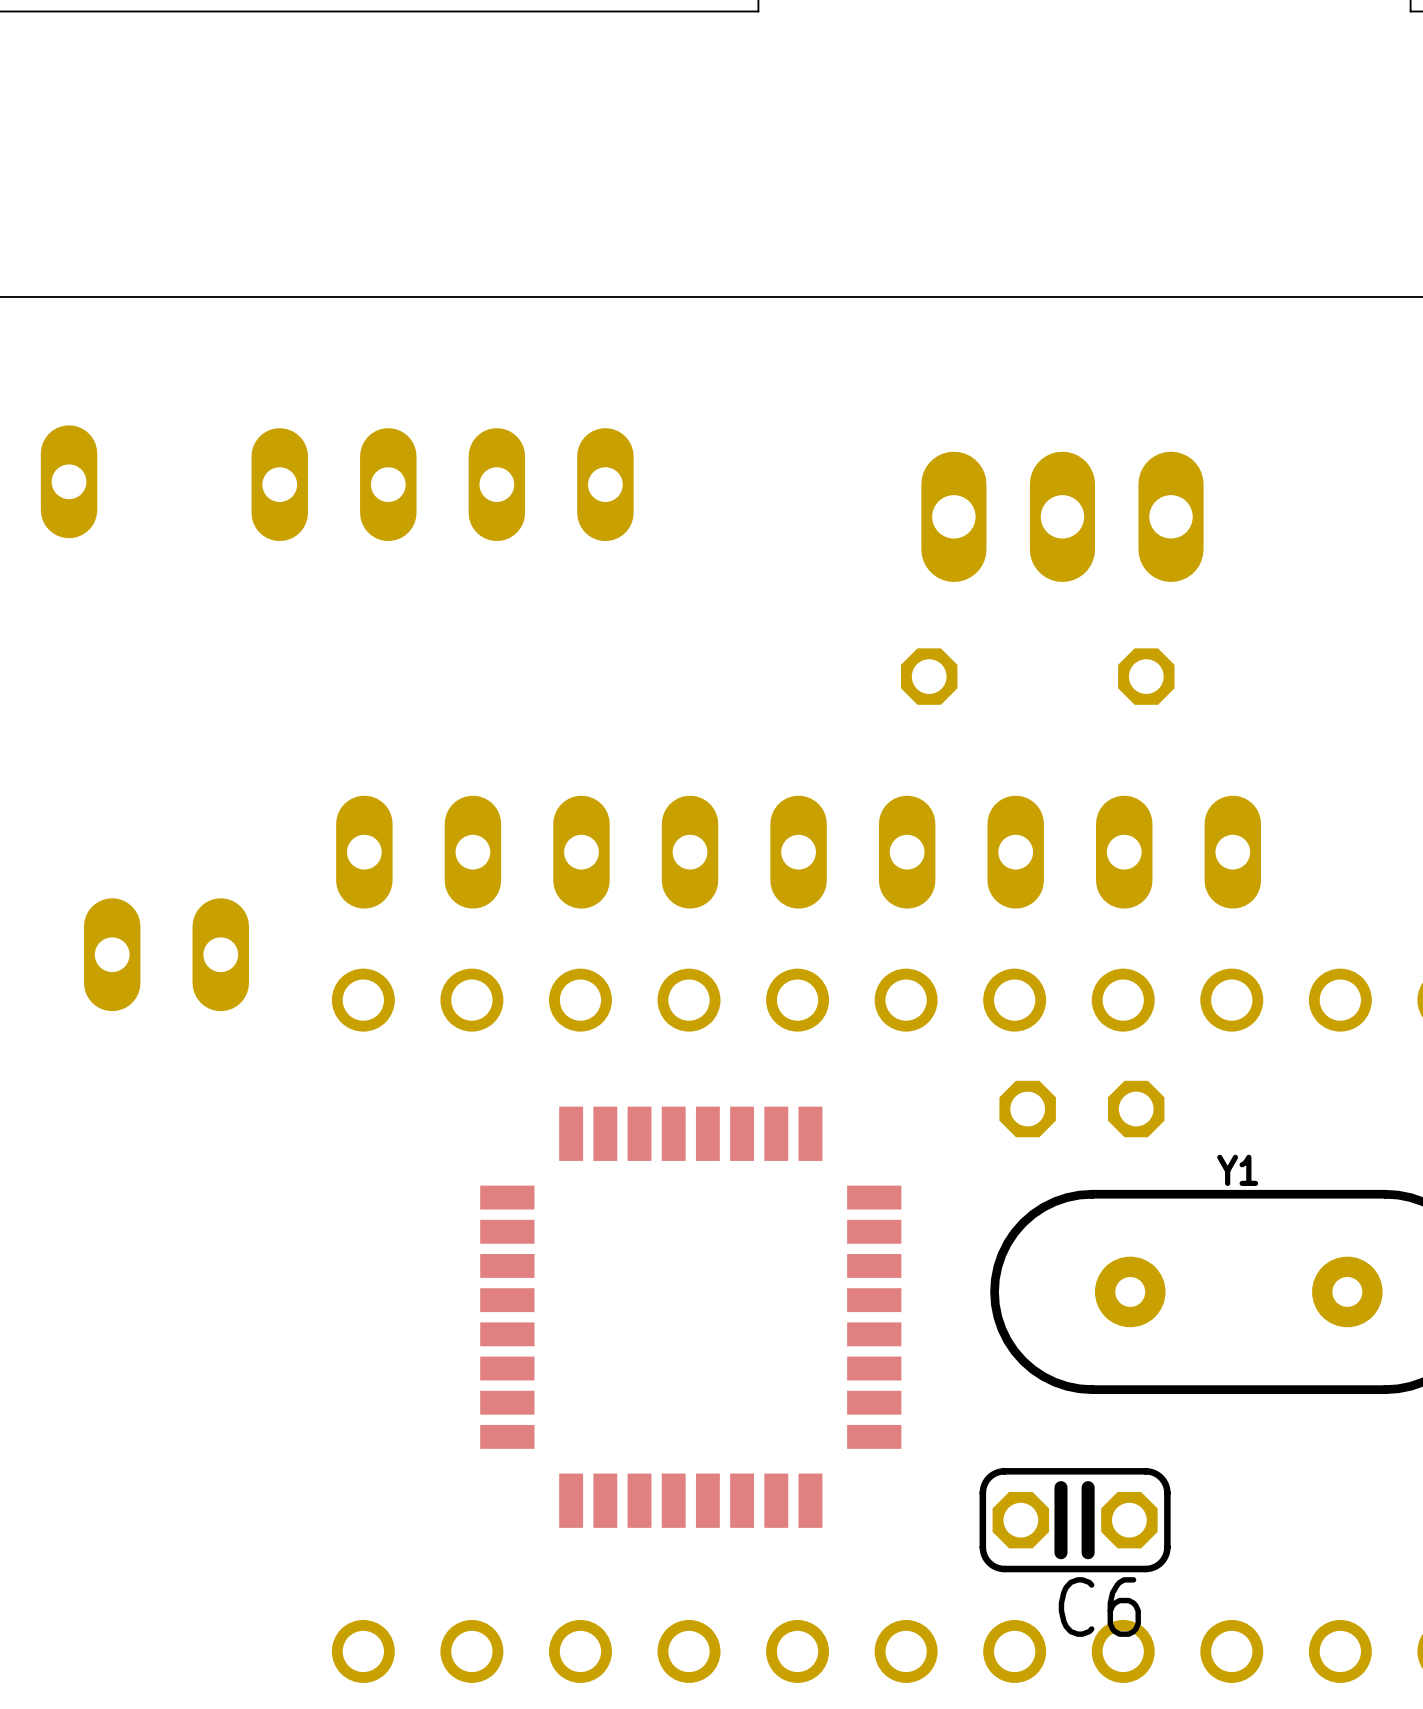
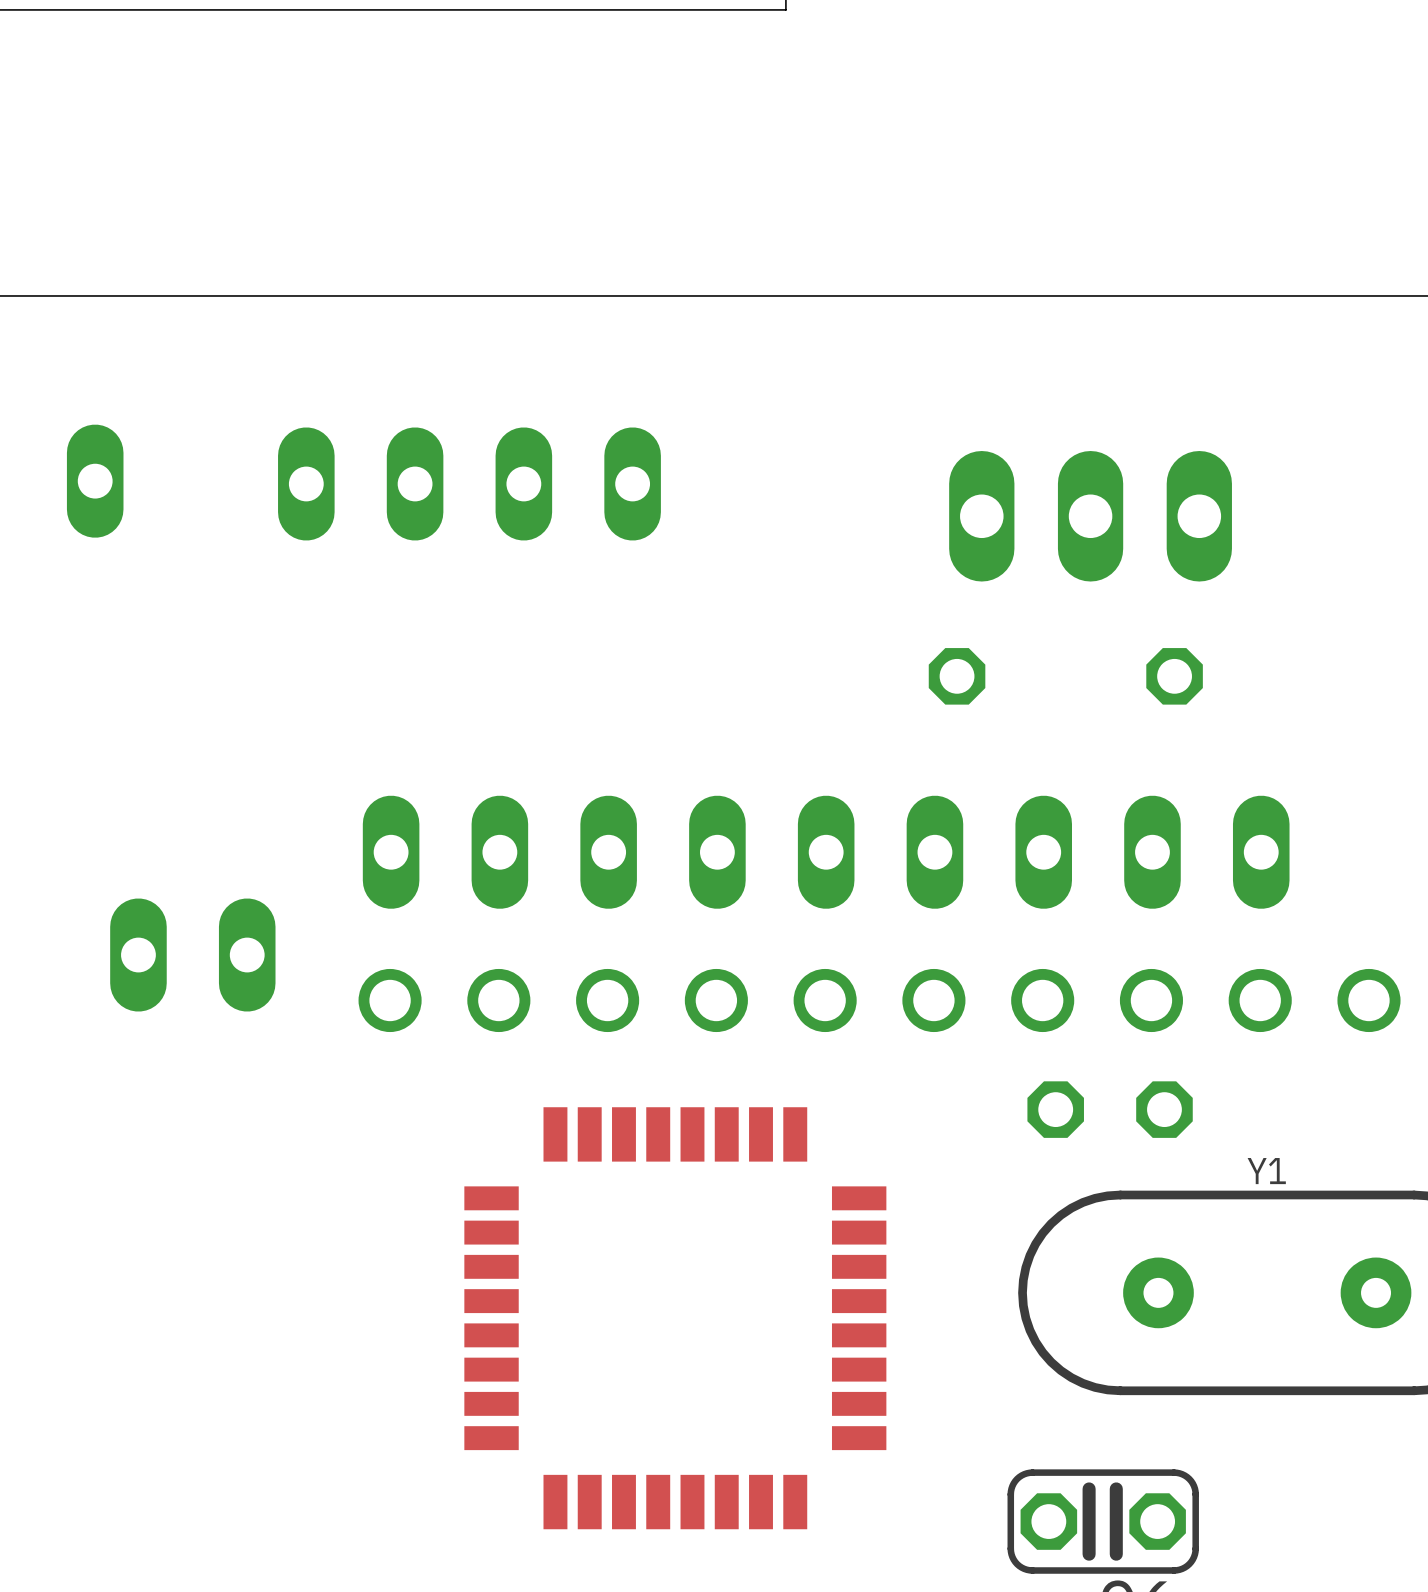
part position: (690, 1317) -> (675, 1318)

